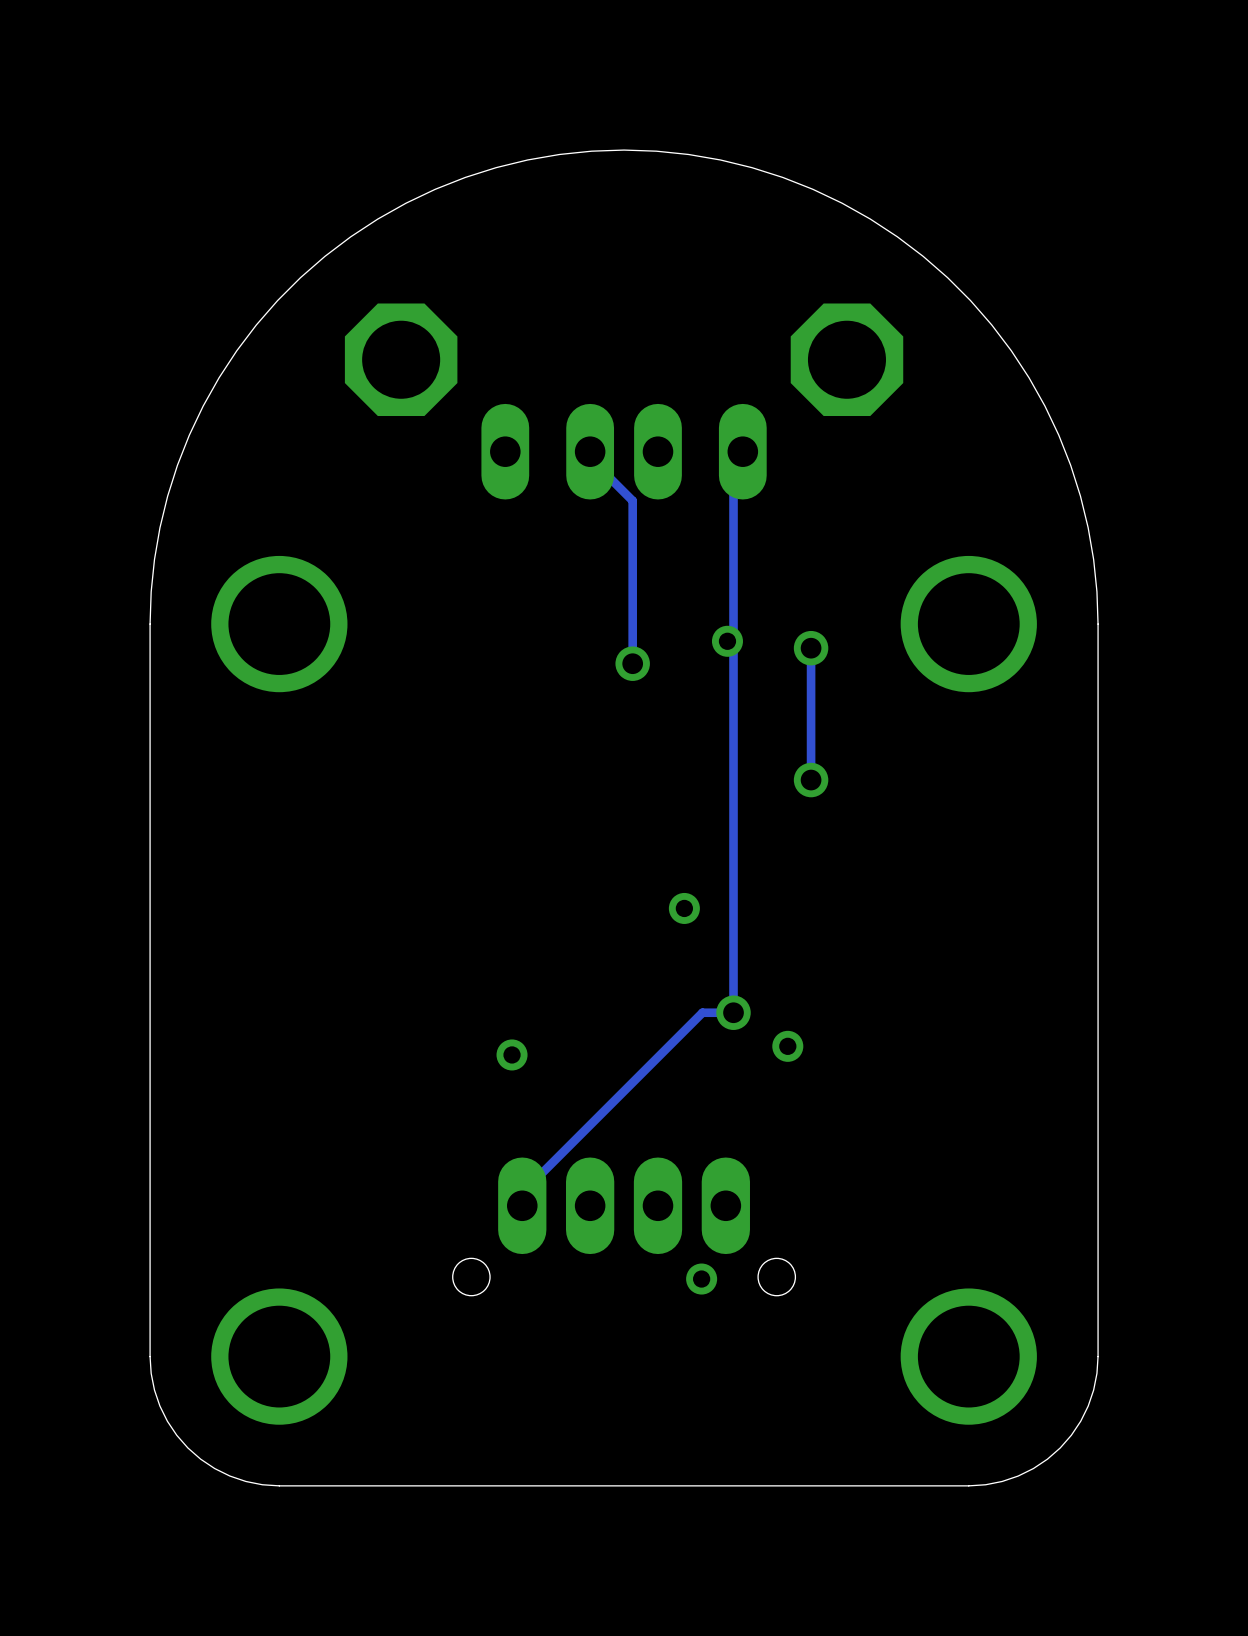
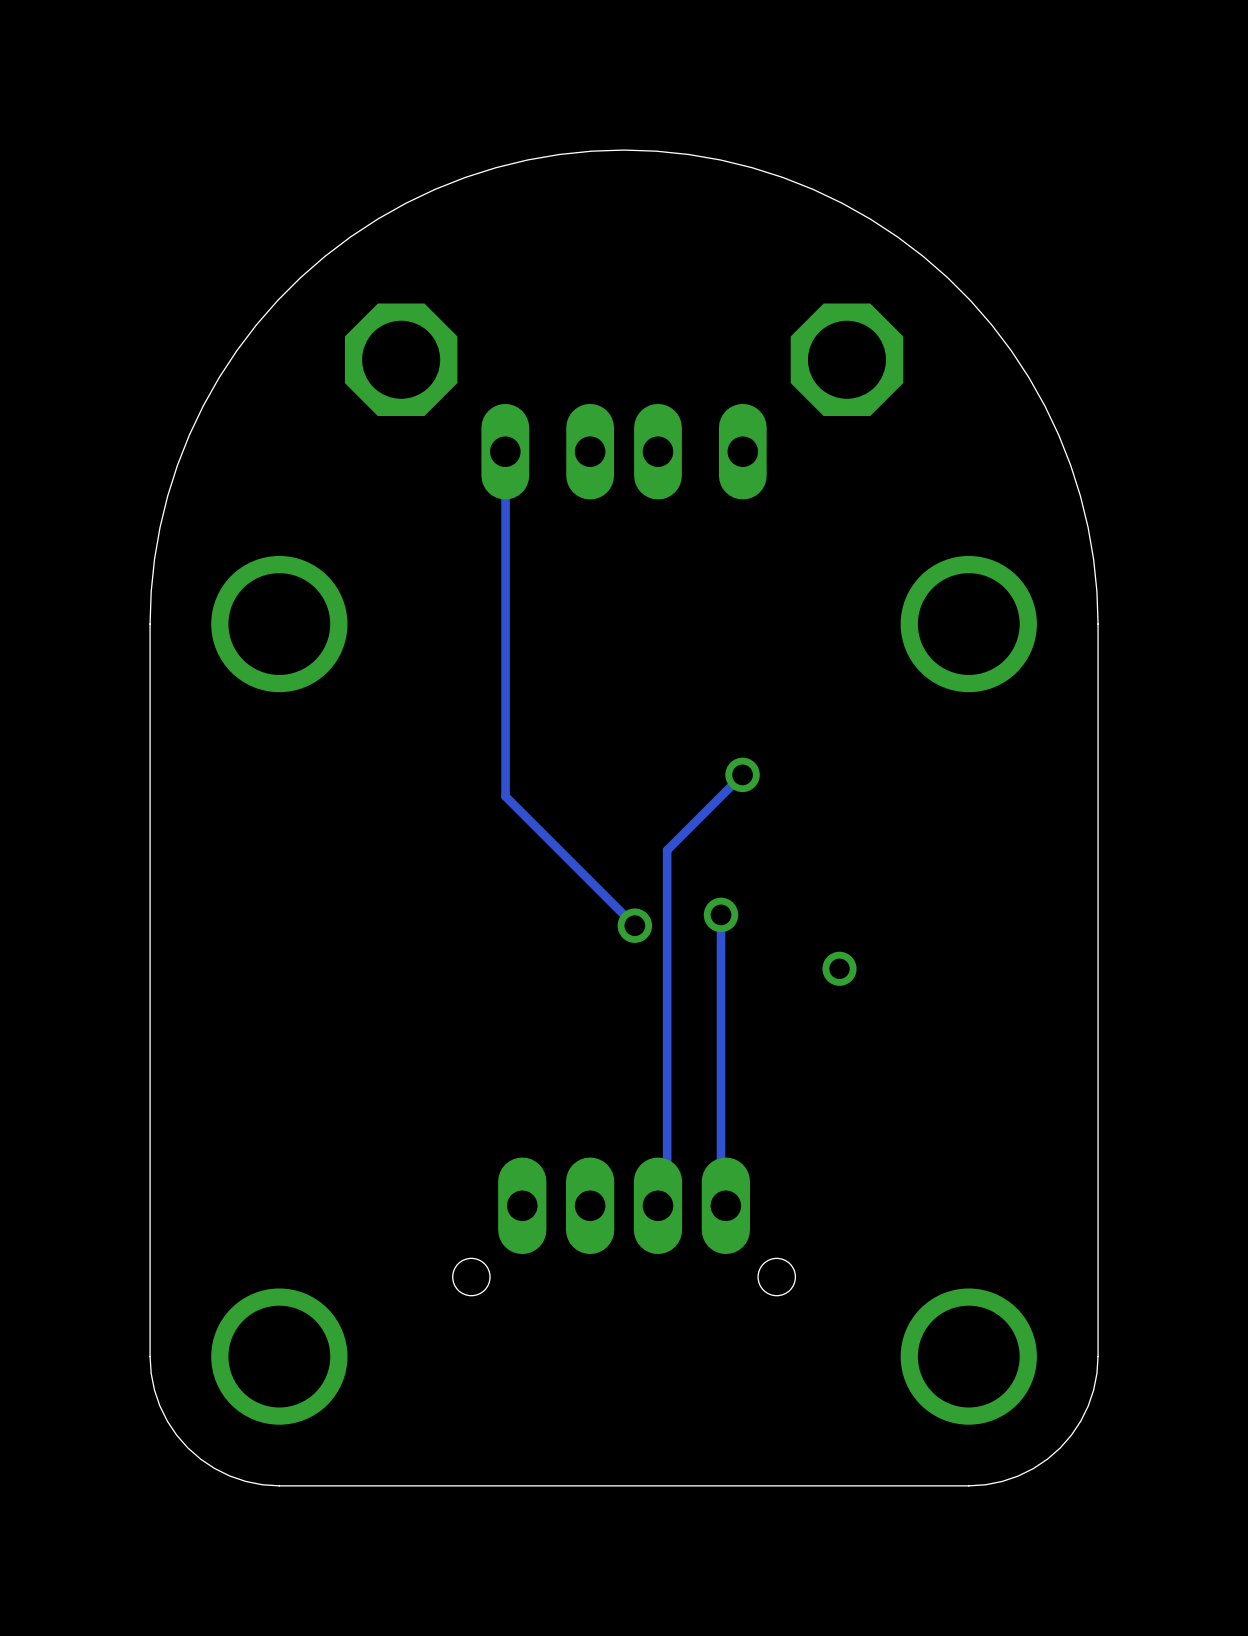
track: none -> (505, 451) (505, 796) (634, 925)
track: (590, 451) (586, 454) (632, 500) (632, 663) -> none
track: (742, 451) (733, 462) (733, 1012) (702, 1012) (516, 1198) (522, 1205) -> none
via: (727, 641) -> none
track: (811, 648) (811, 780) -> none
via: (811, 648) -> none
via: (632, 663) -> none
track: none -> (742, 774) (667, 850) (667, 1205) (657, 1205)
via position: (811, 780) -> (742, 774)
via: (684, 908) -> none
track: none -> (721, 914) (721, 1205) (725, 1205)
via: none -> (721, 914)
via: none -> (634, 925)
via: none -> (839, 968)
via: (733, 1012) -> none
via: (787, 1046) -> none
via: (512, 1054) -> none
via: (701, 1279) -> none

